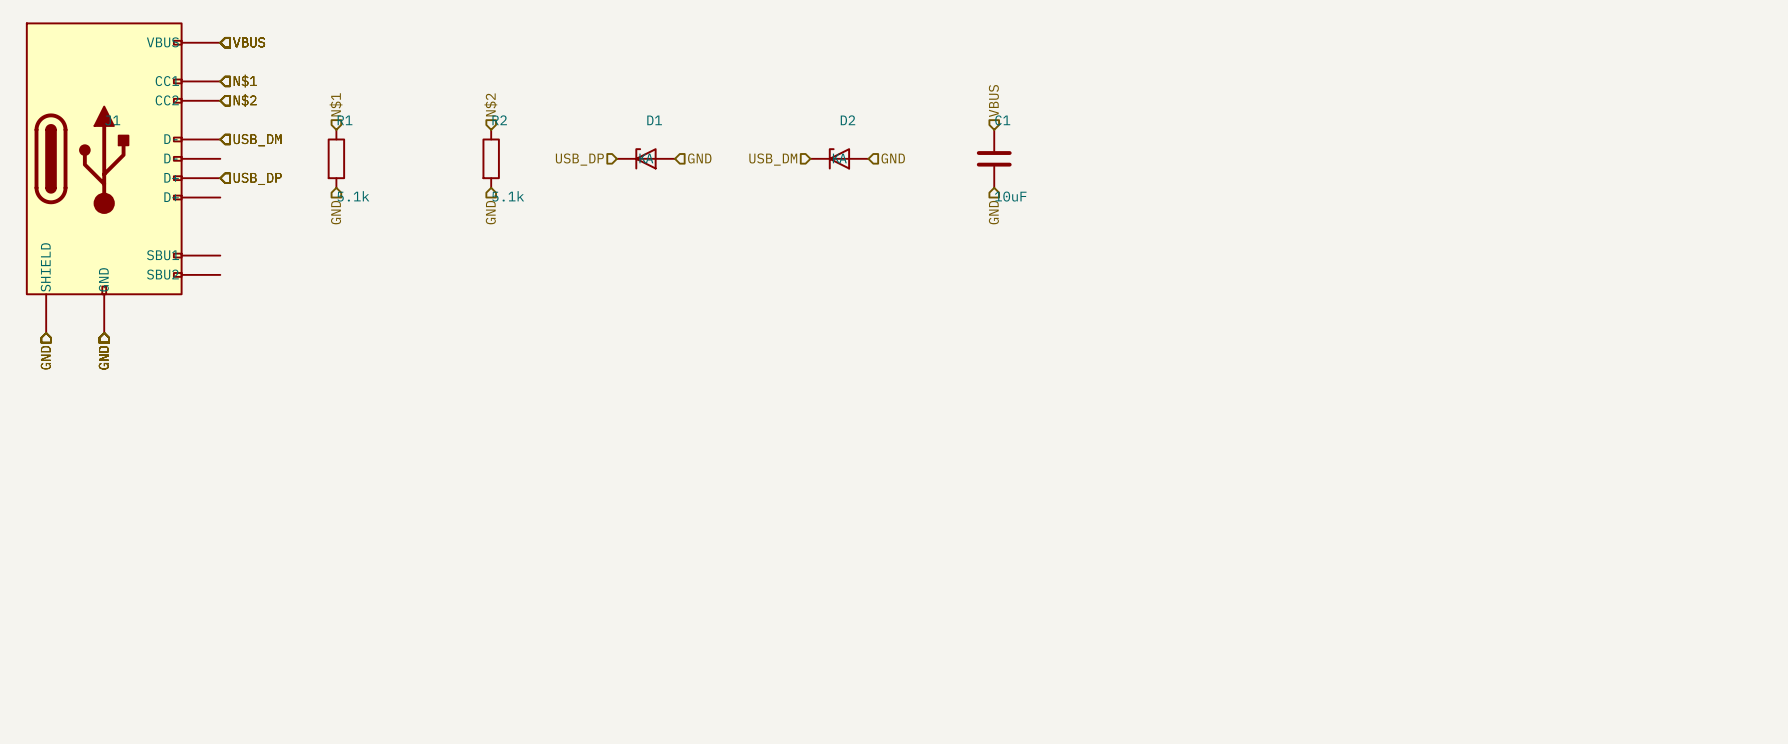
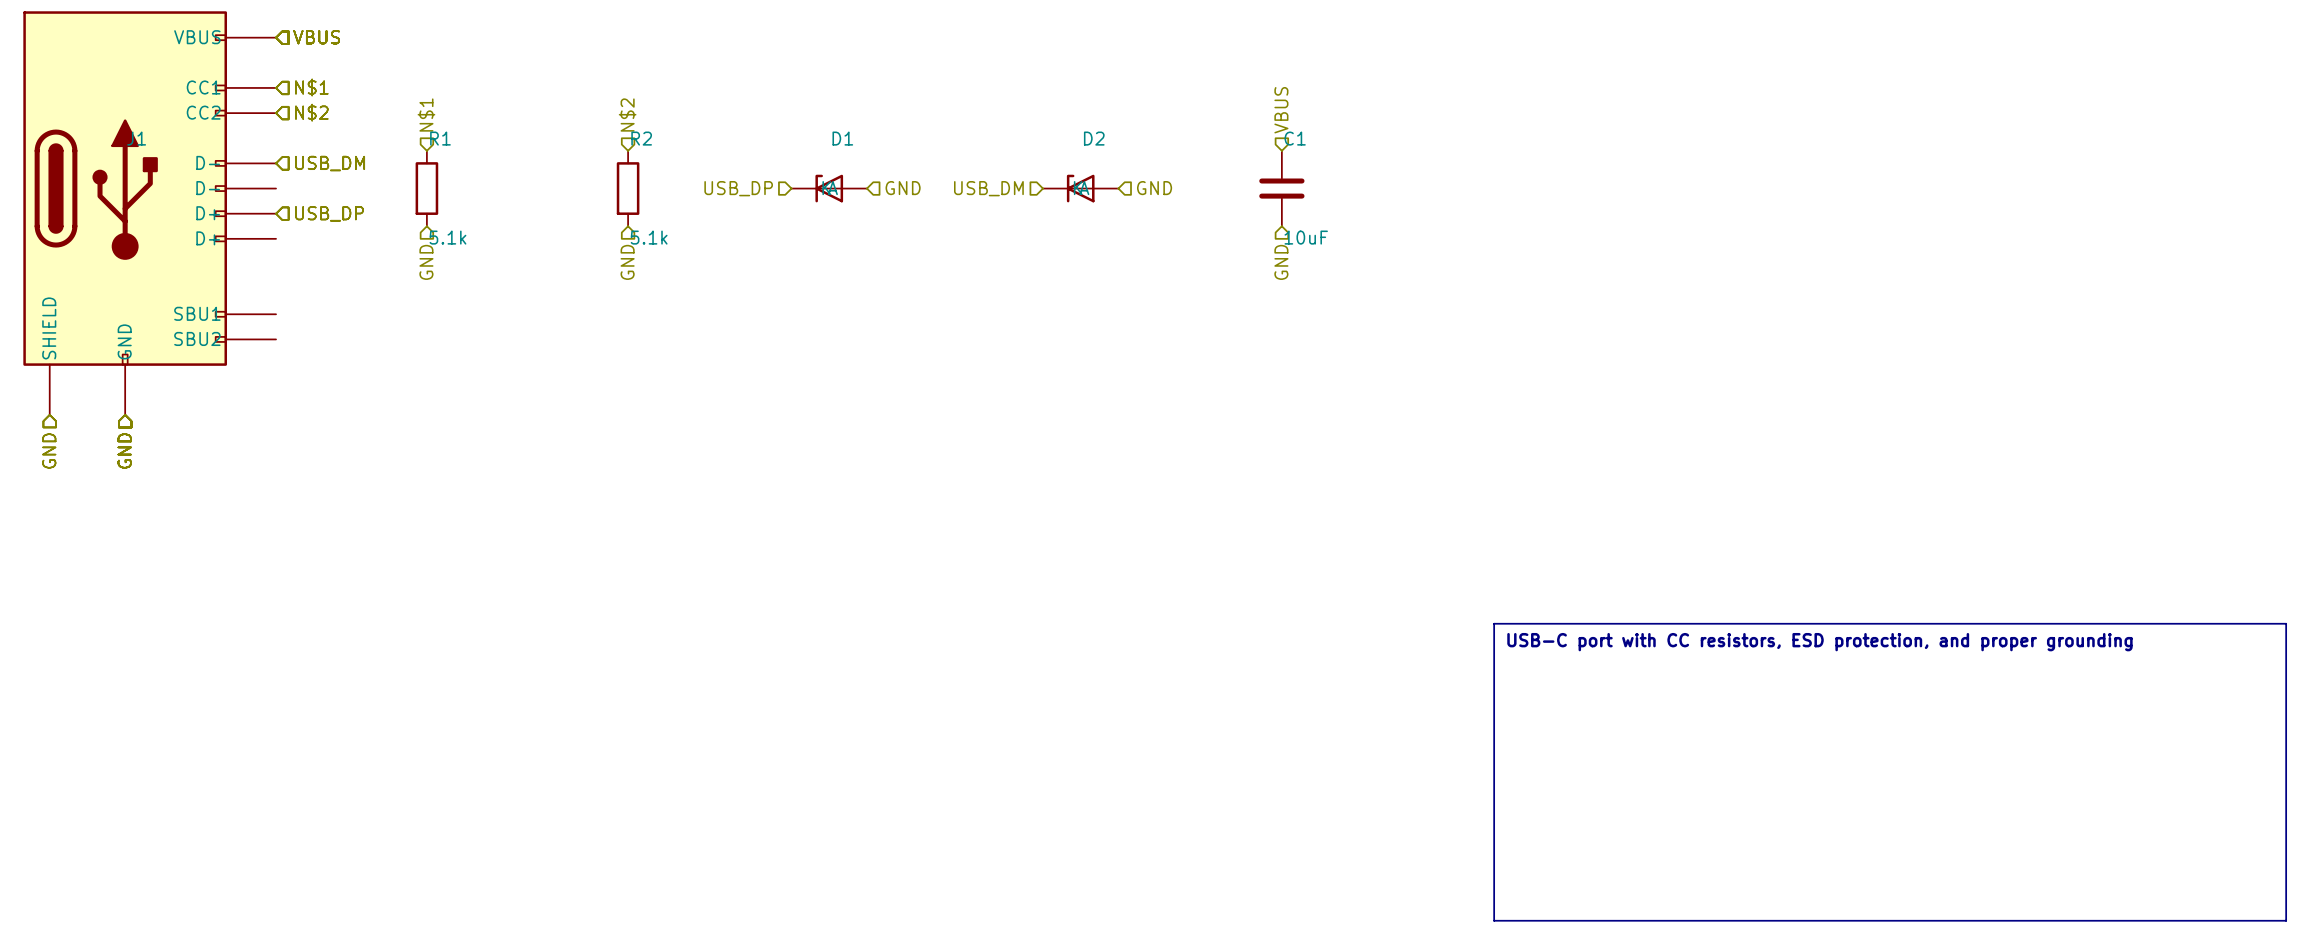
line: none -> (1494, 623) (2286, 623) (2286, 920) (1494, 920) (1494, 623)
text: none -> USB-C port with CC resistors, ESD protection, and proper grounding (1819, 642)

